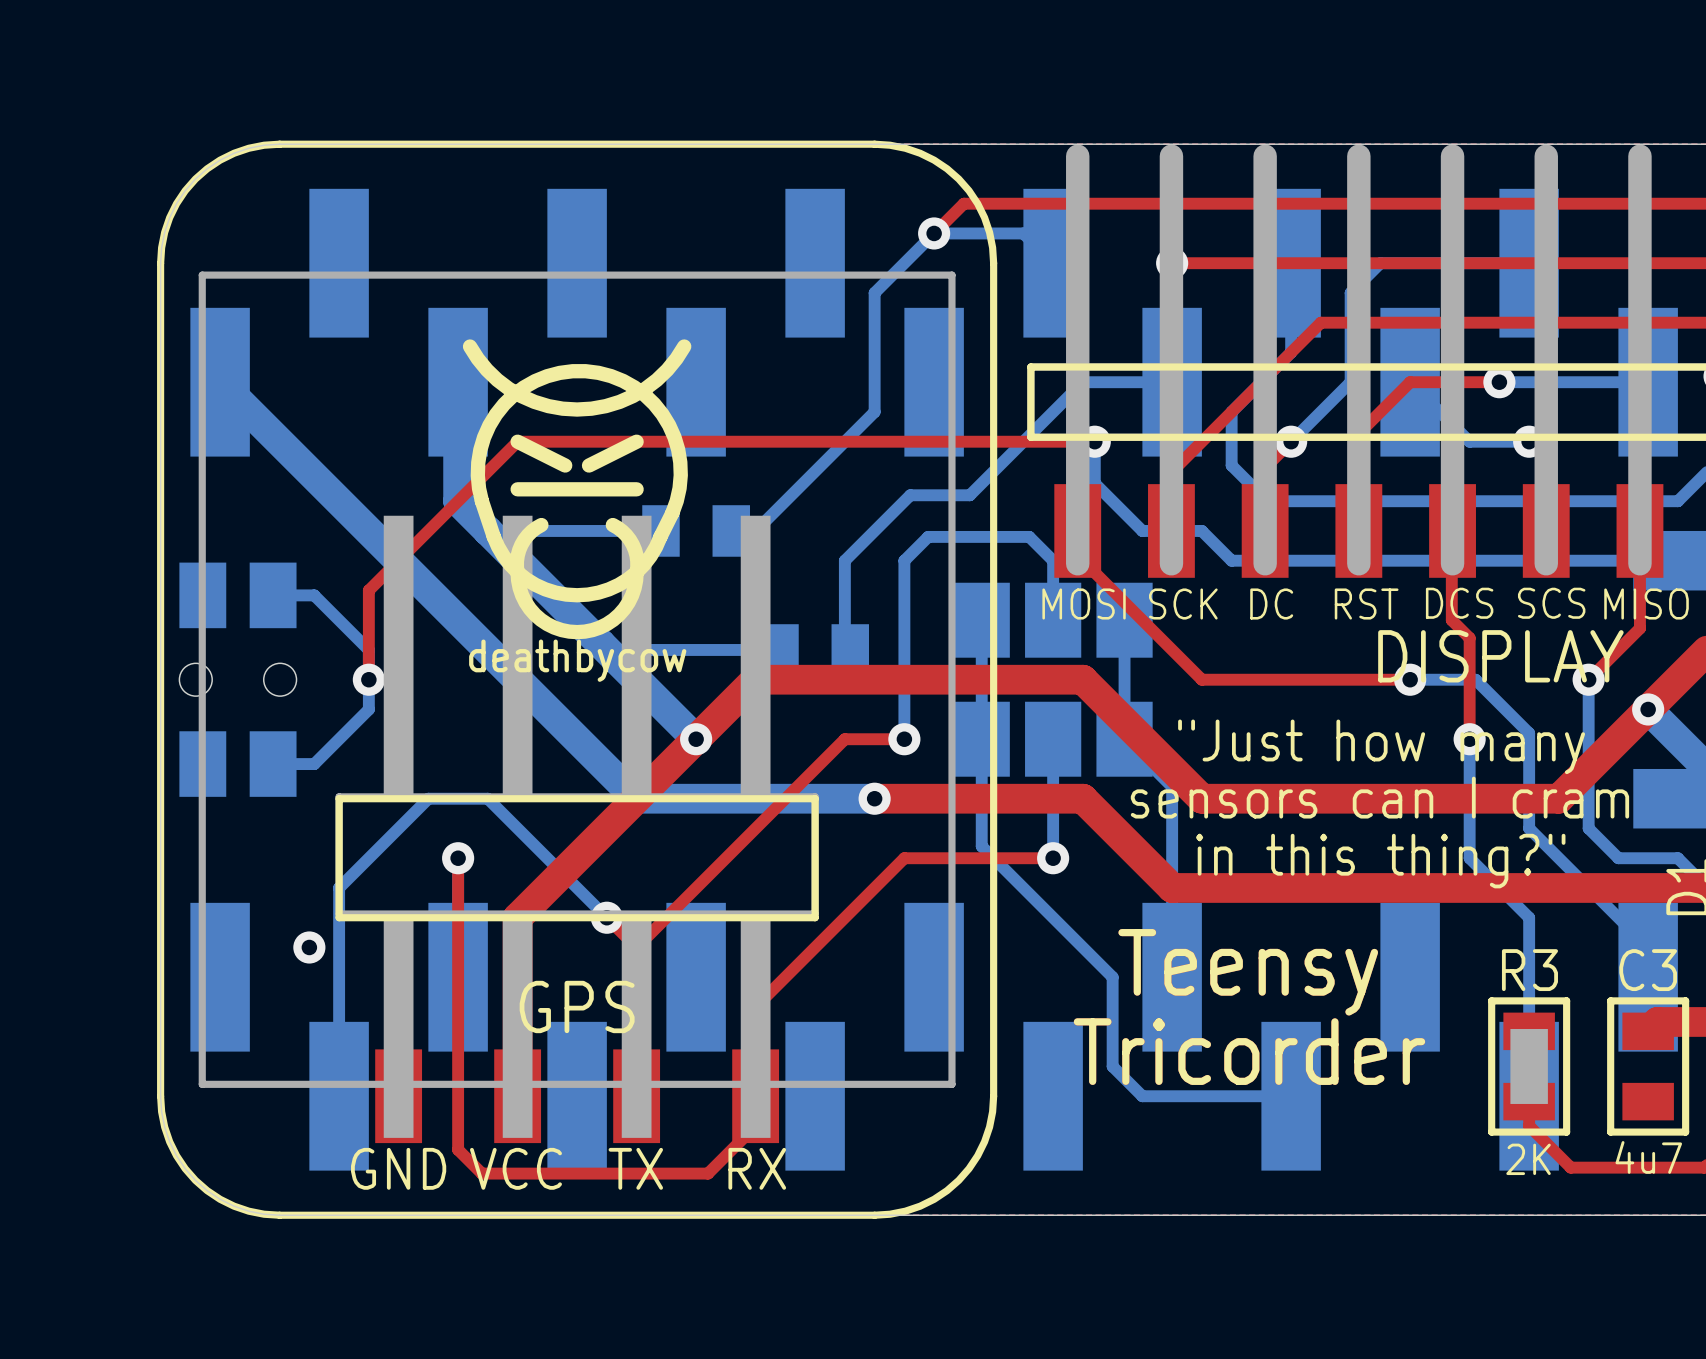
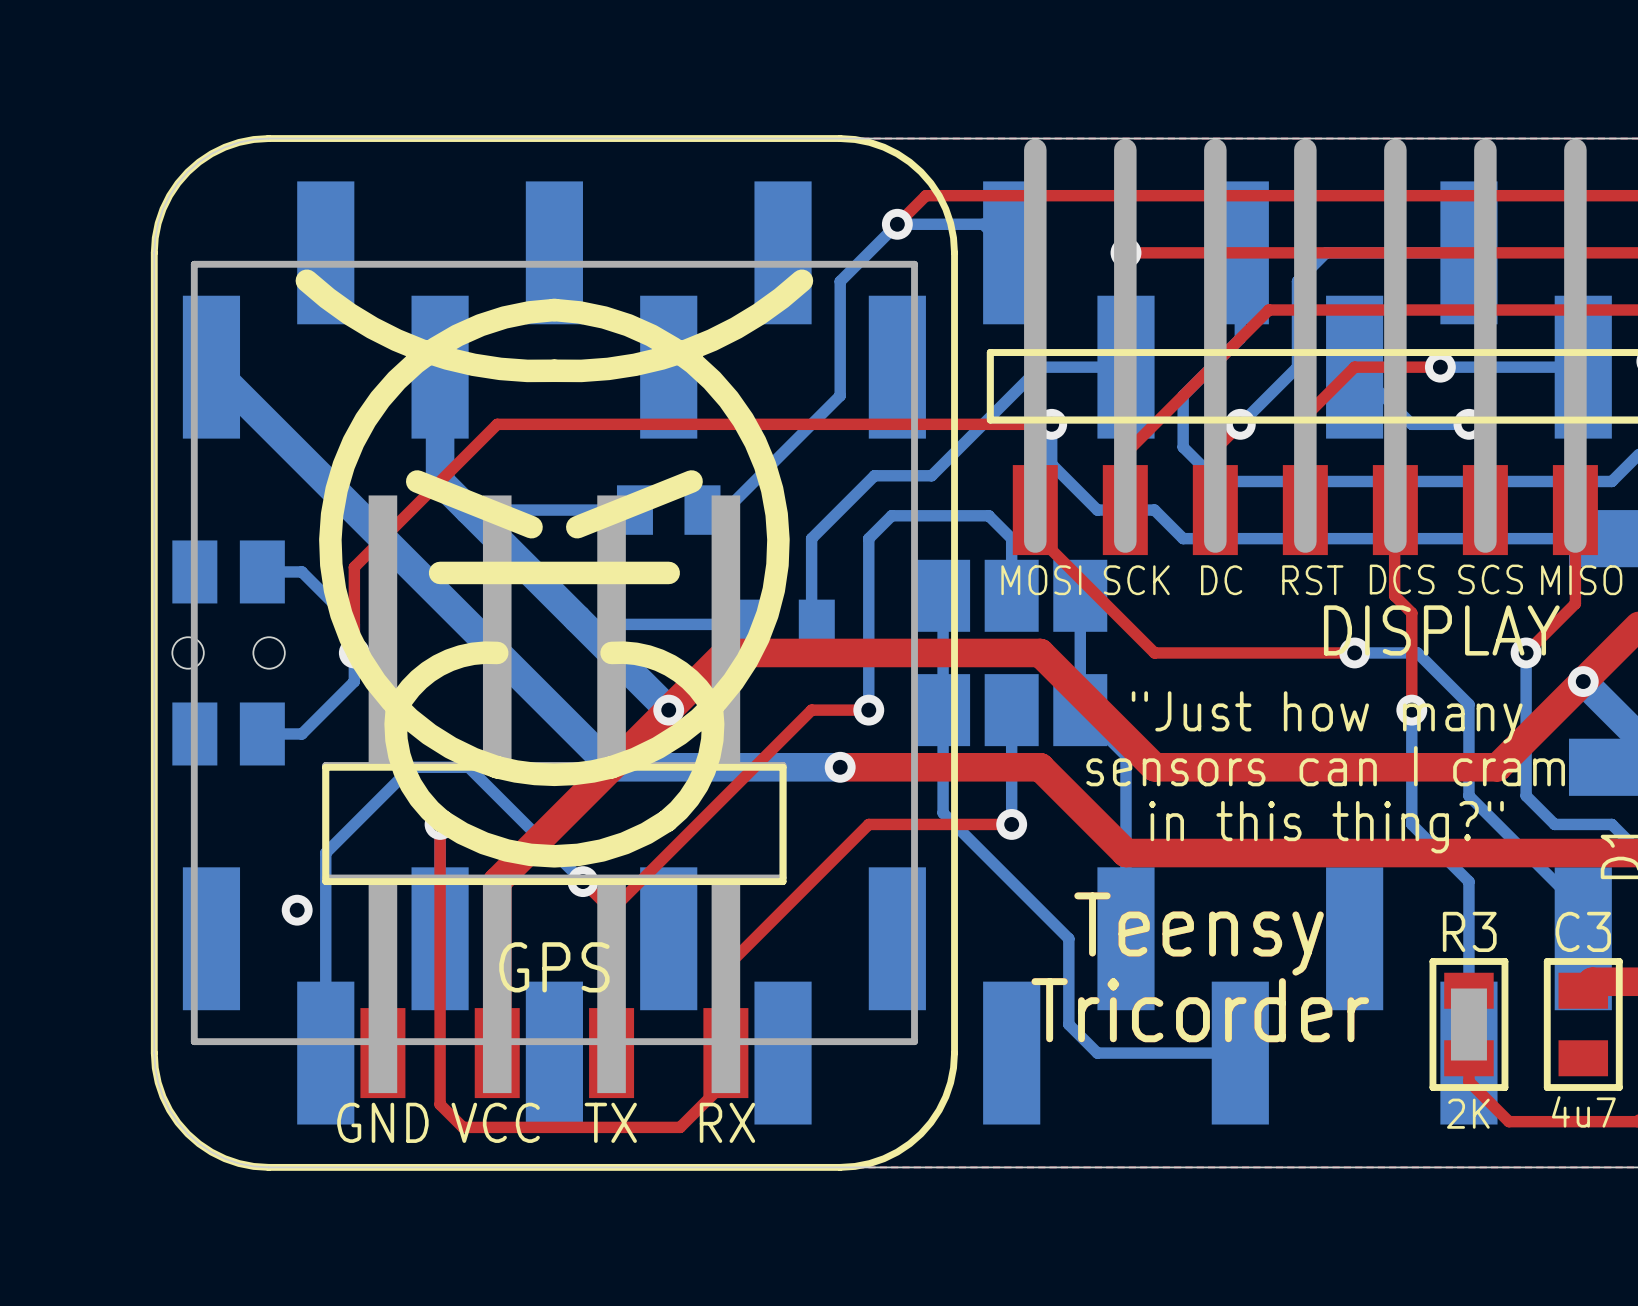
drawing: none -> [295, 269, 814, 868]
drawing: [462, 339, 692, 640] -> none

